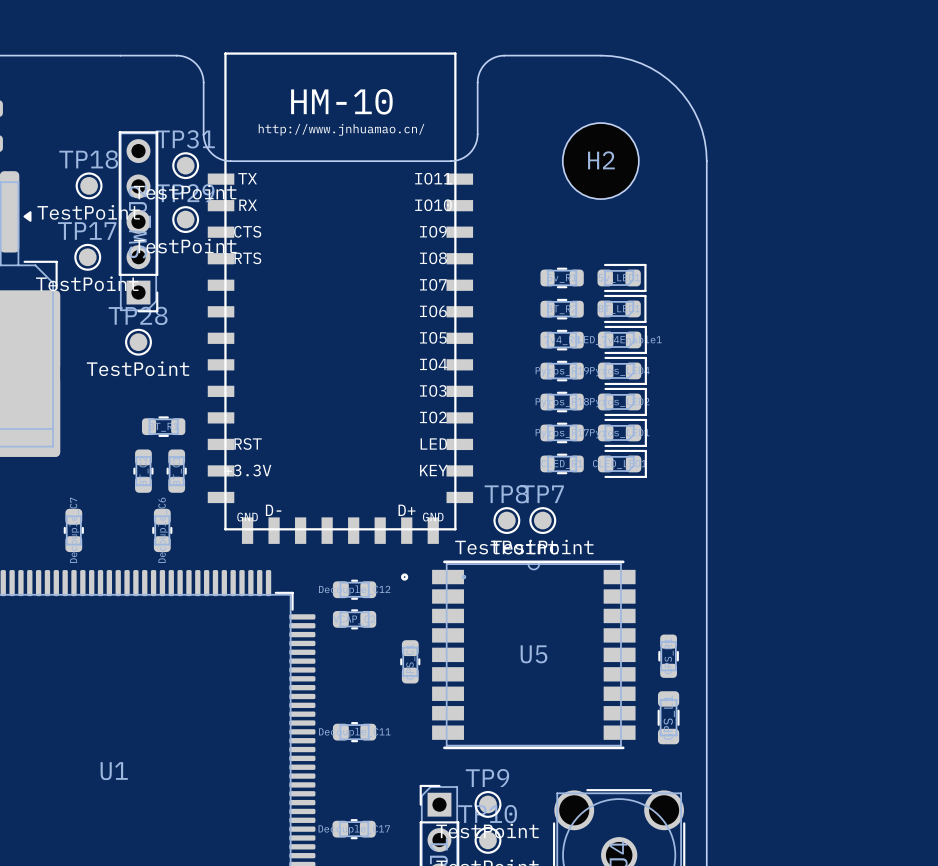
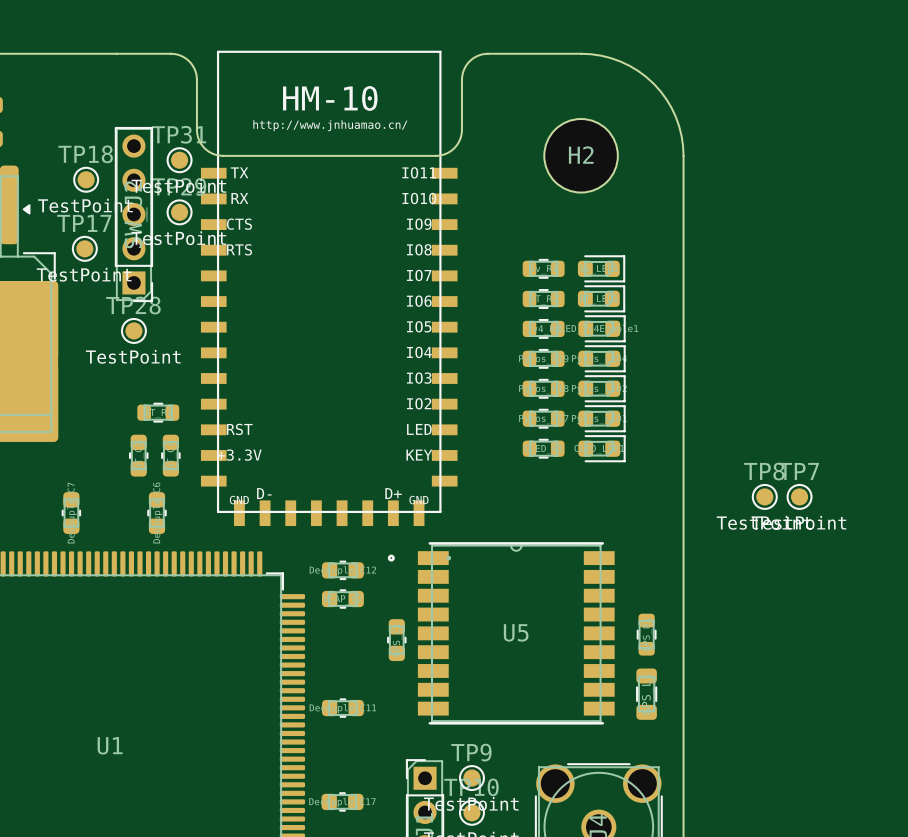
TP8 position: (506, 520) -> (764, 496)
TP7 position: (542, 520) -> (799, 496)

